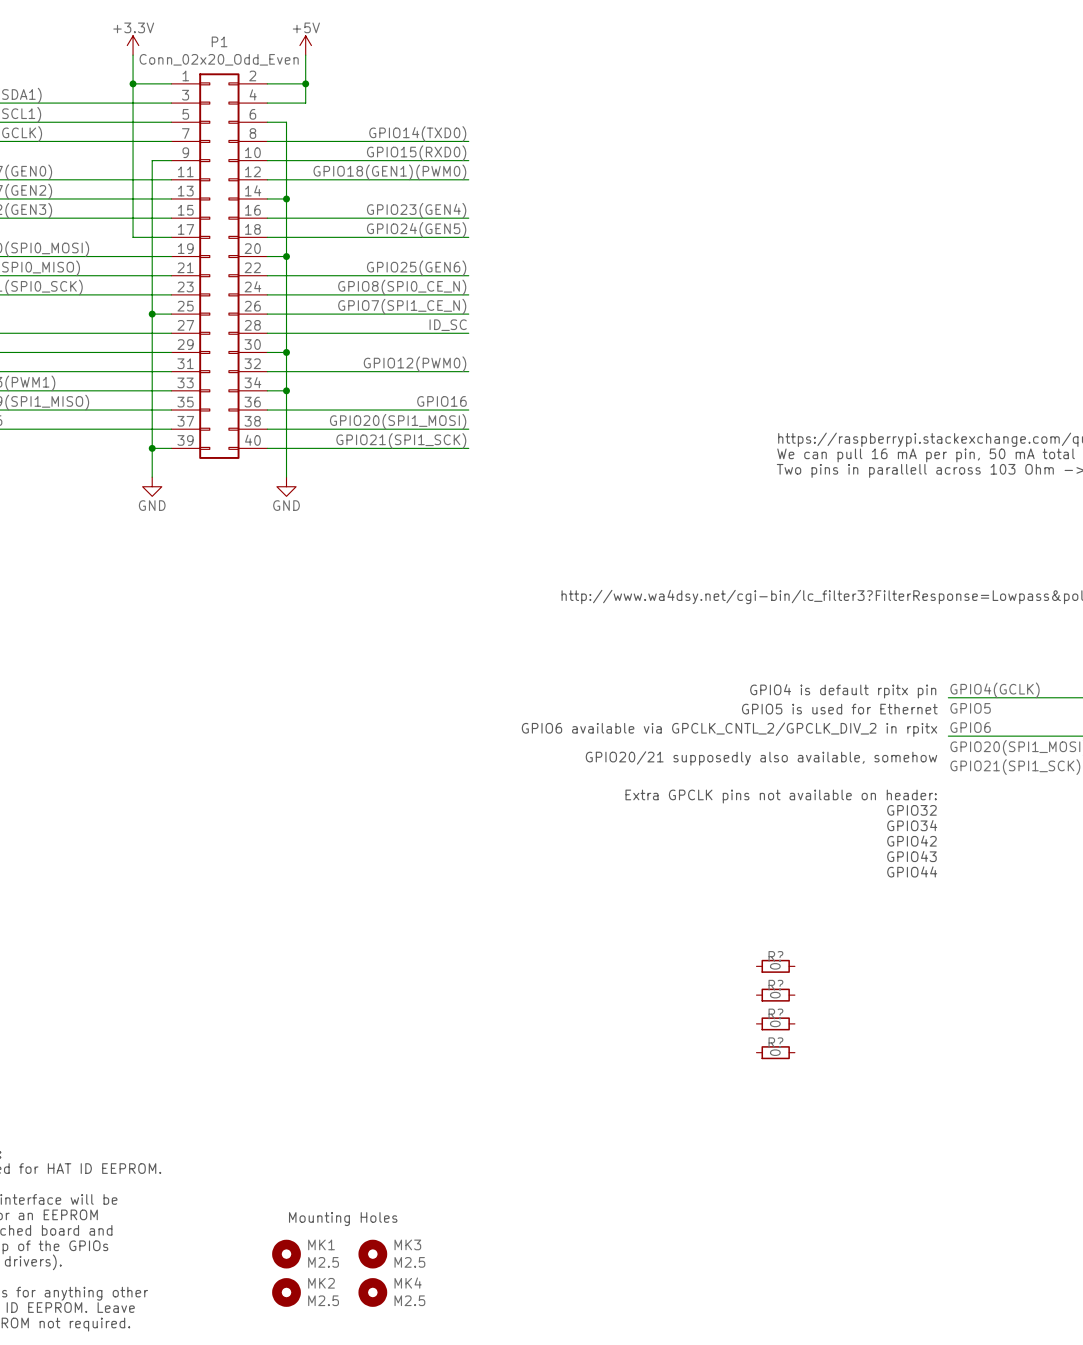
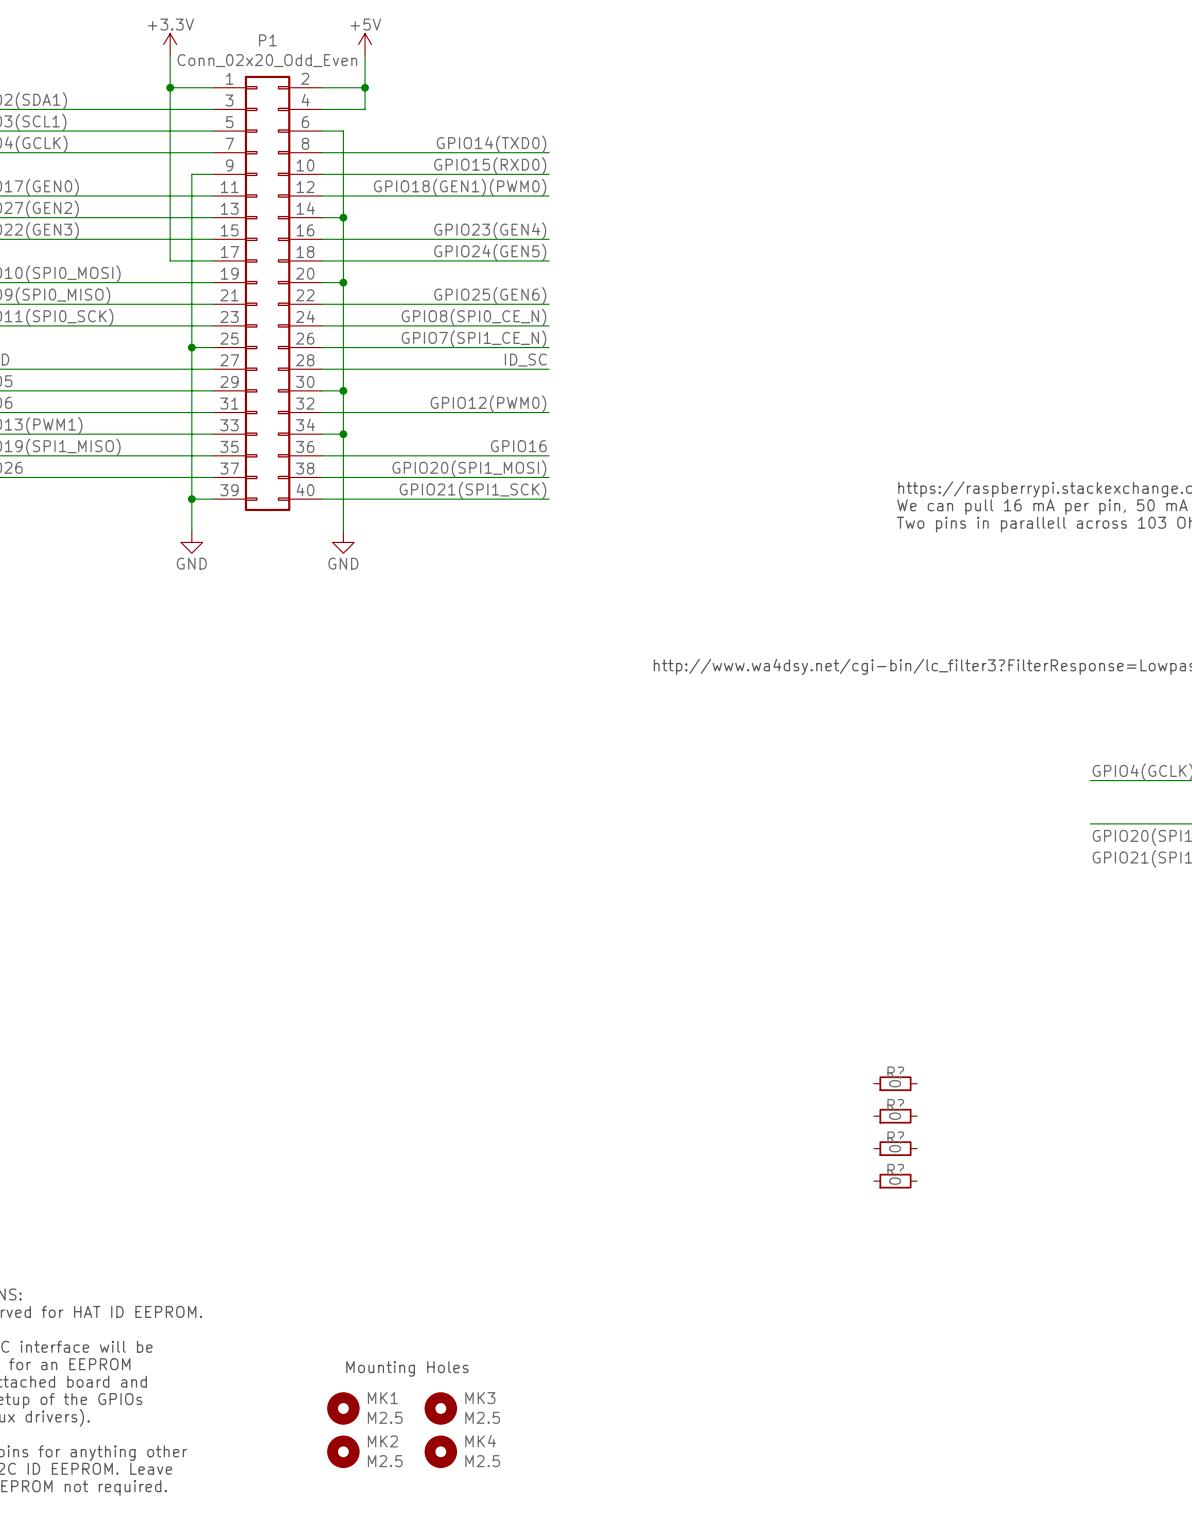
text: GPIO4 is default rpitx pin (843, 691) -> none
label: GPIO5 (970, 708) -> none
text: GPIO5 is used for Ethernet (839, 709) -> none
label: GPIO6 (970, 727) -> none
text: GPIO6 available via GPCLK_CNTL_2/GPCLK_DIV_2 in rpitx (729, 729) -> none
text: GPIO20/21 supposedly also available, somehow (761, 758) -> none
text: Extra GPCLK pins not available on header: (781, 796) -> none
text: GPIO32 (911, 810) -> none
text: GPIO34 (912, 825) -> none
text: GPIO42 (911, 841) -> none
text: GPIO43 (911, 856) -> none
text: GPIO44 (912, 871) -> none

